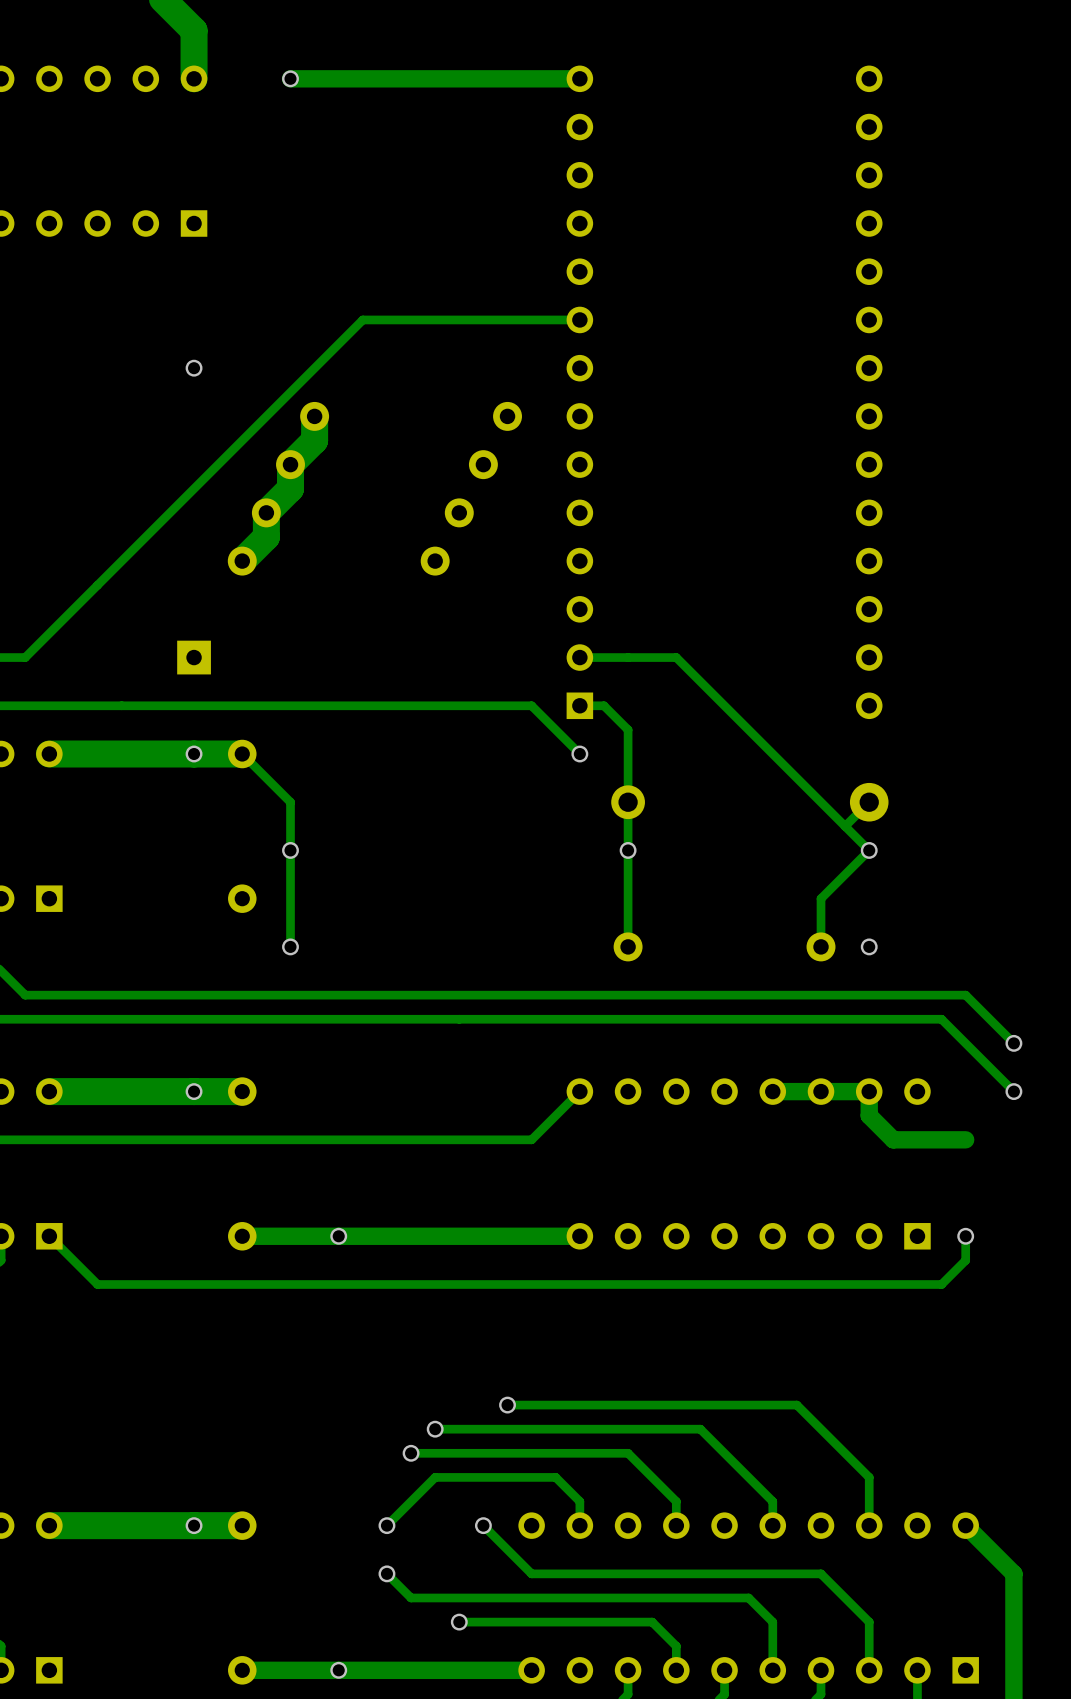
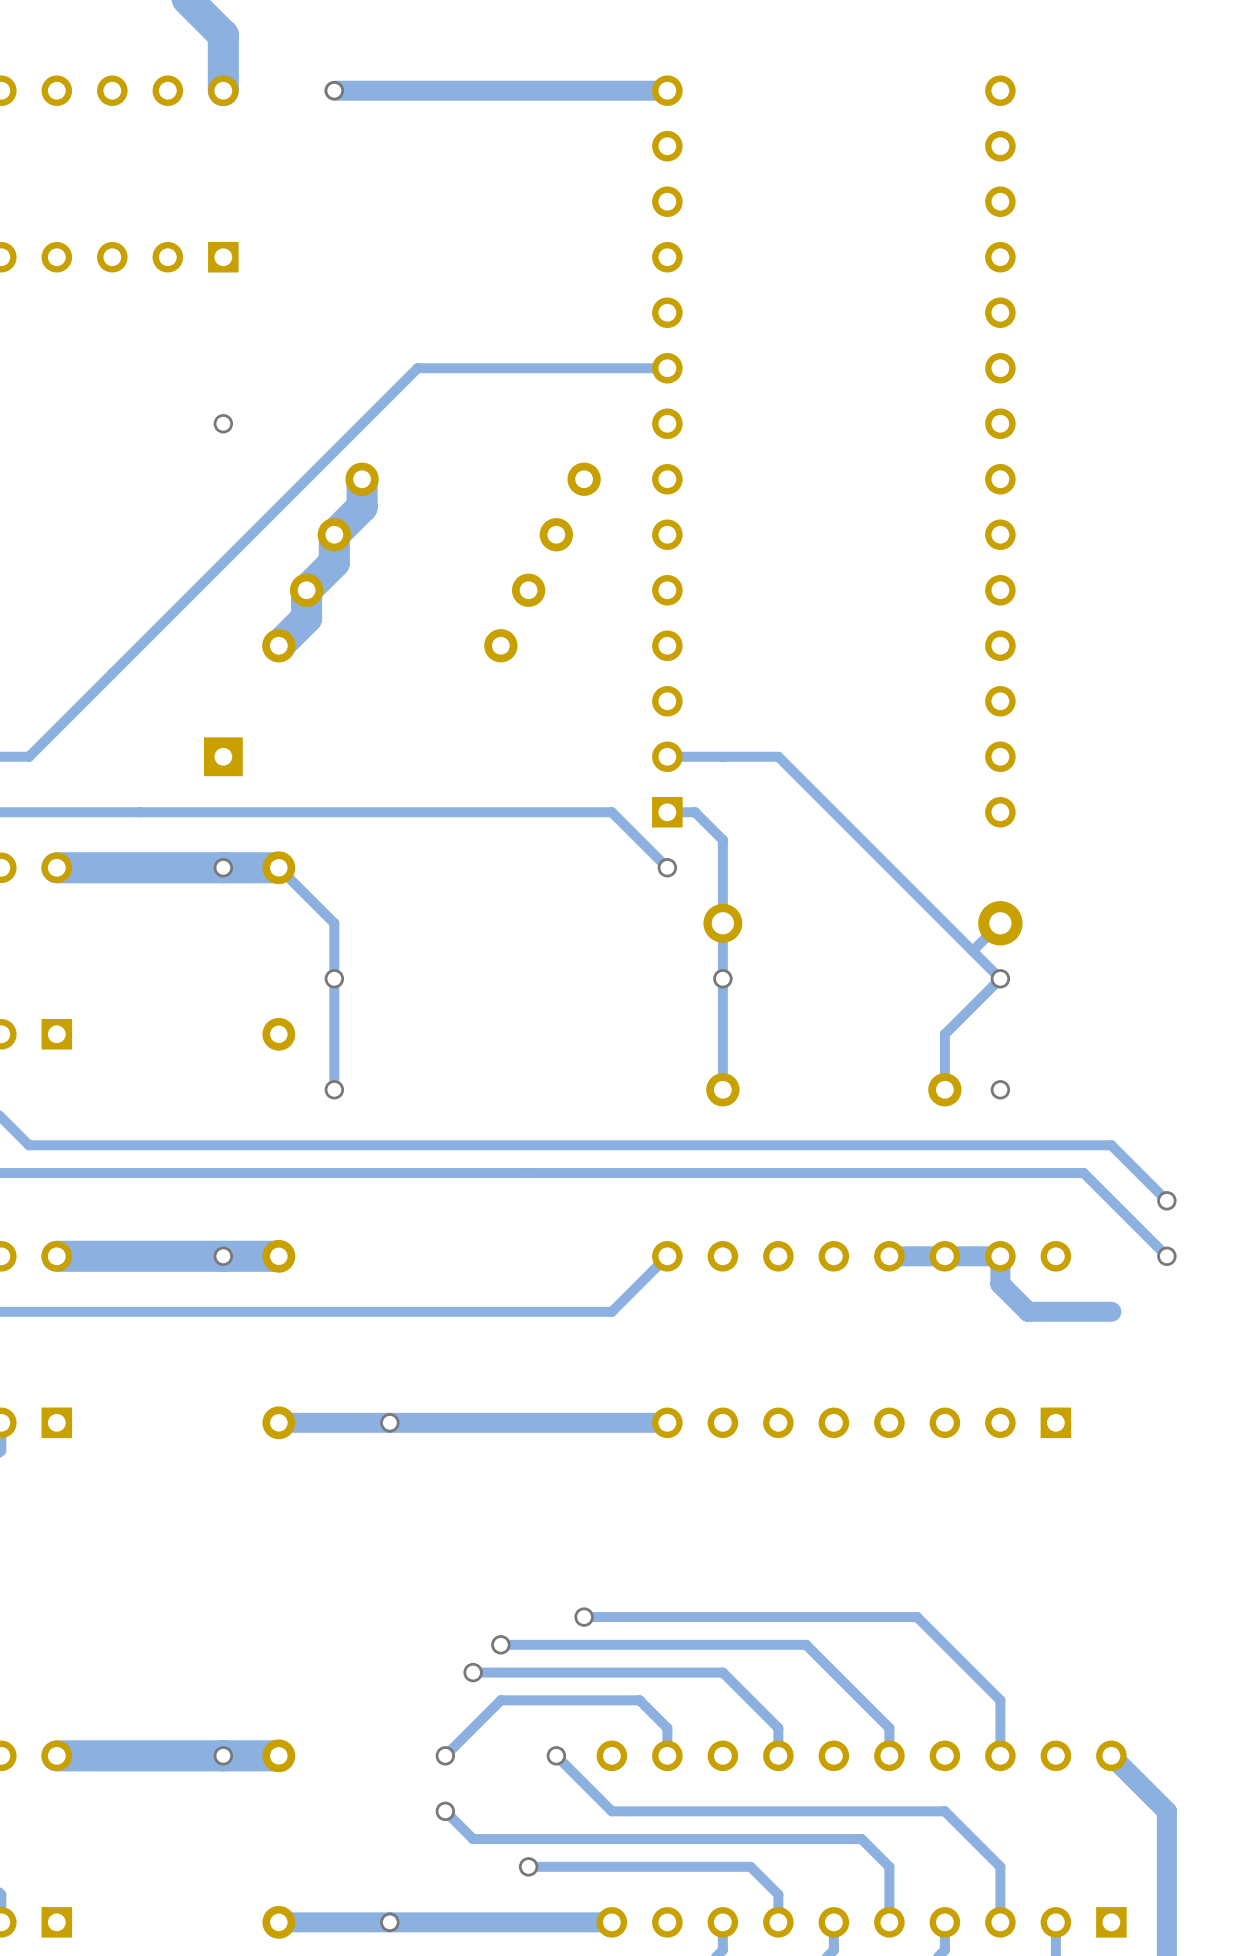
track: (965, 1236) (965, 1260) (941, 1284) (97, 1284) (49, 1236) -> none
via: (965, 1236) -> none

